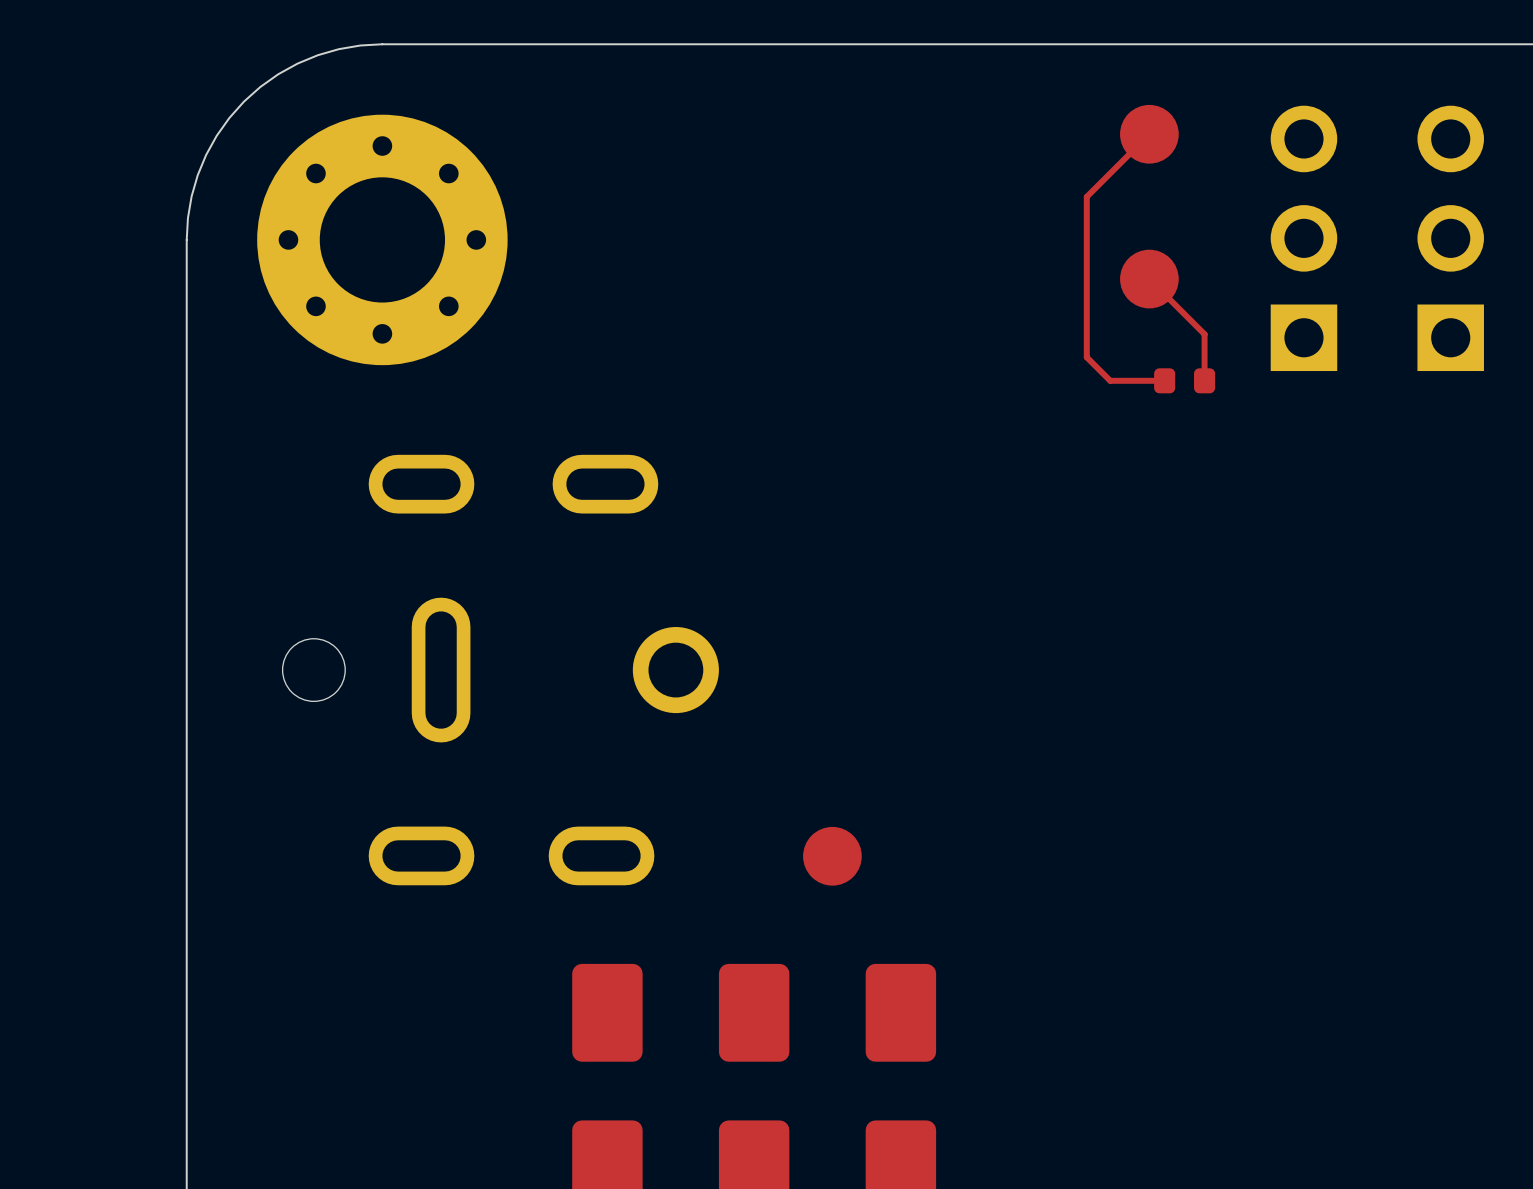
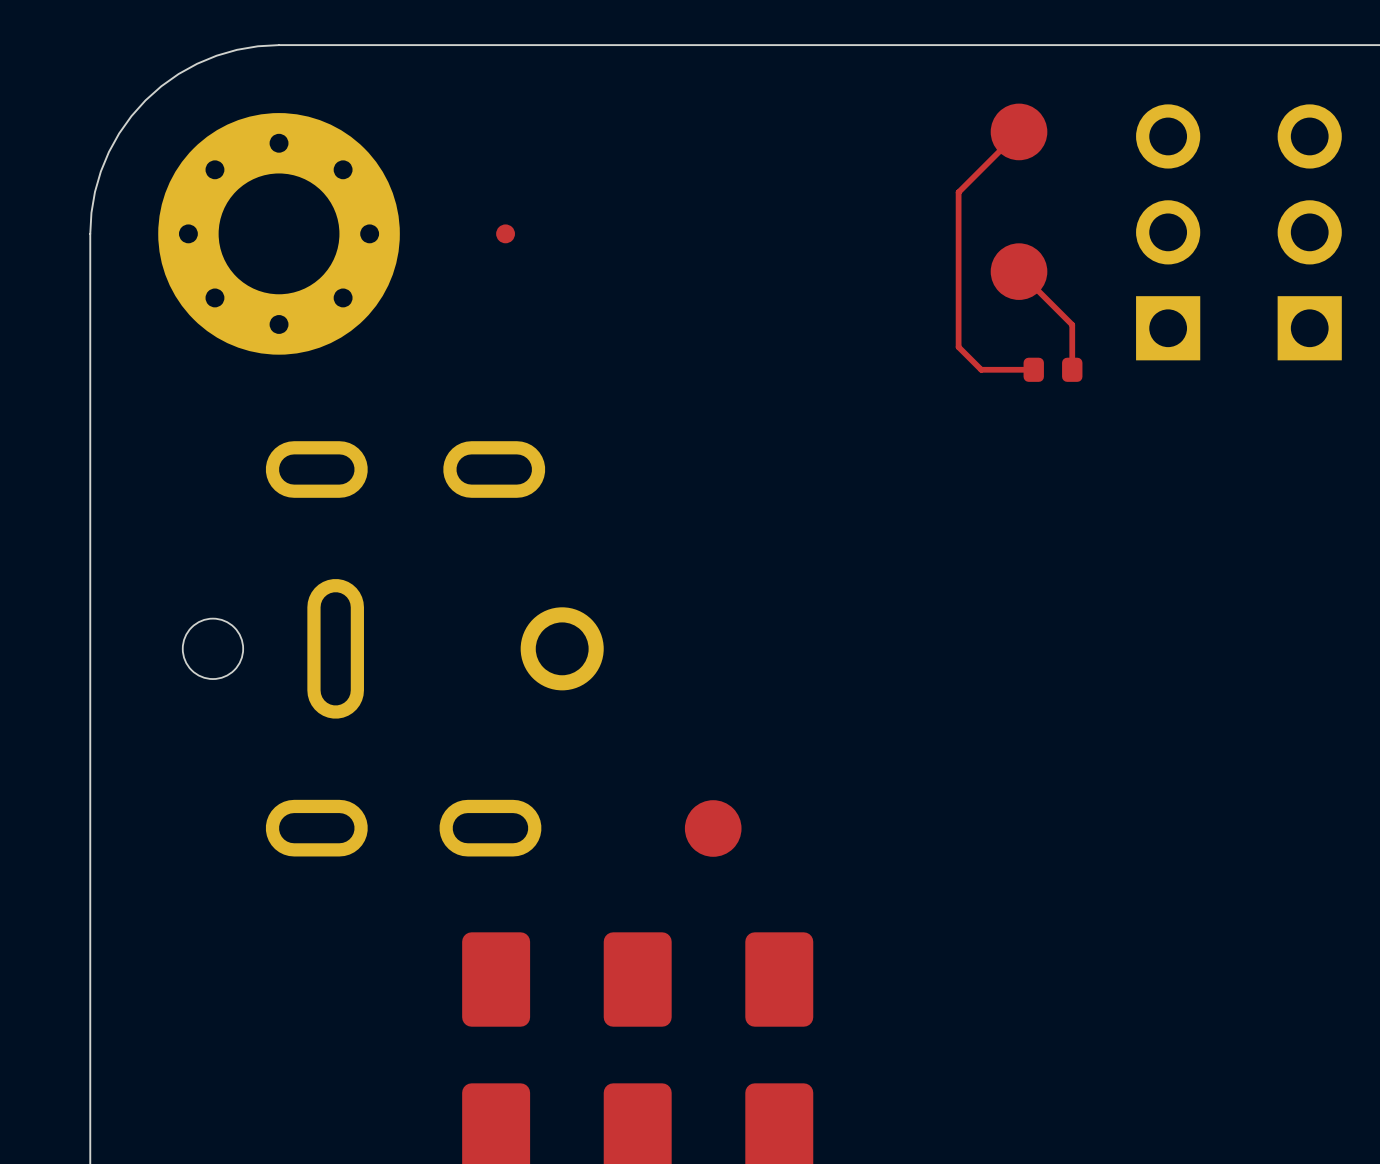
part: none -> (505, 233)

